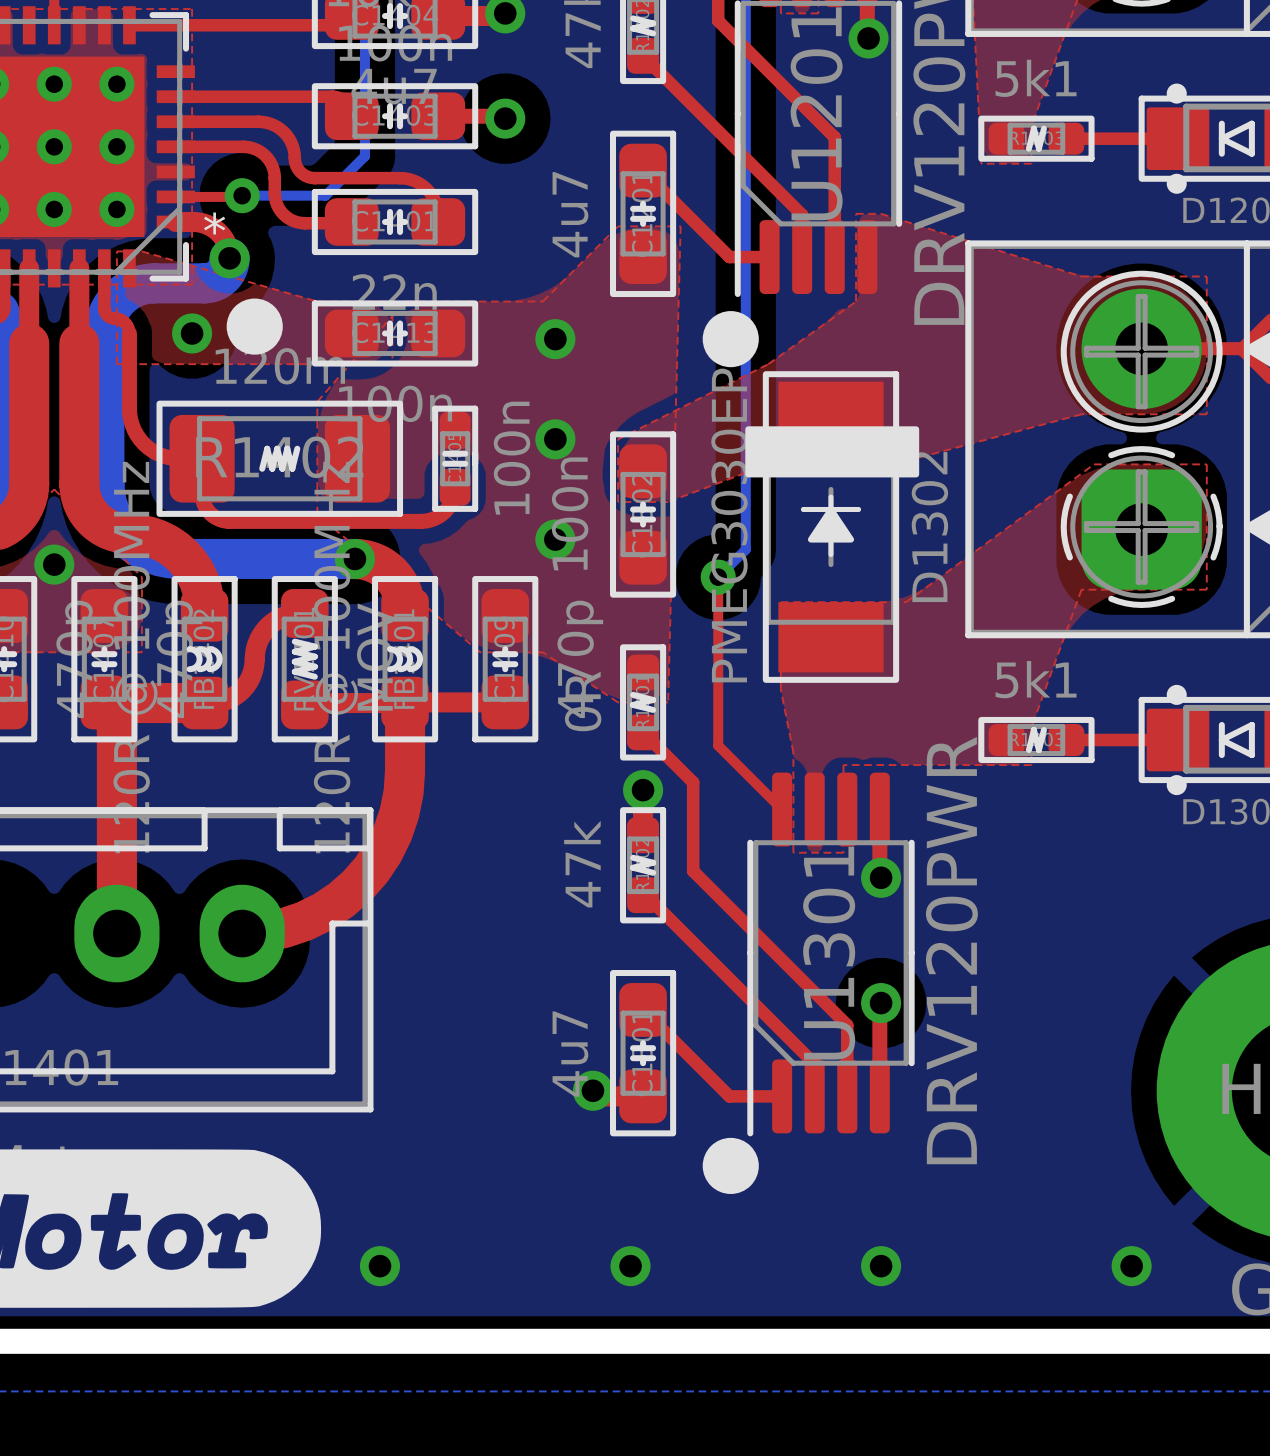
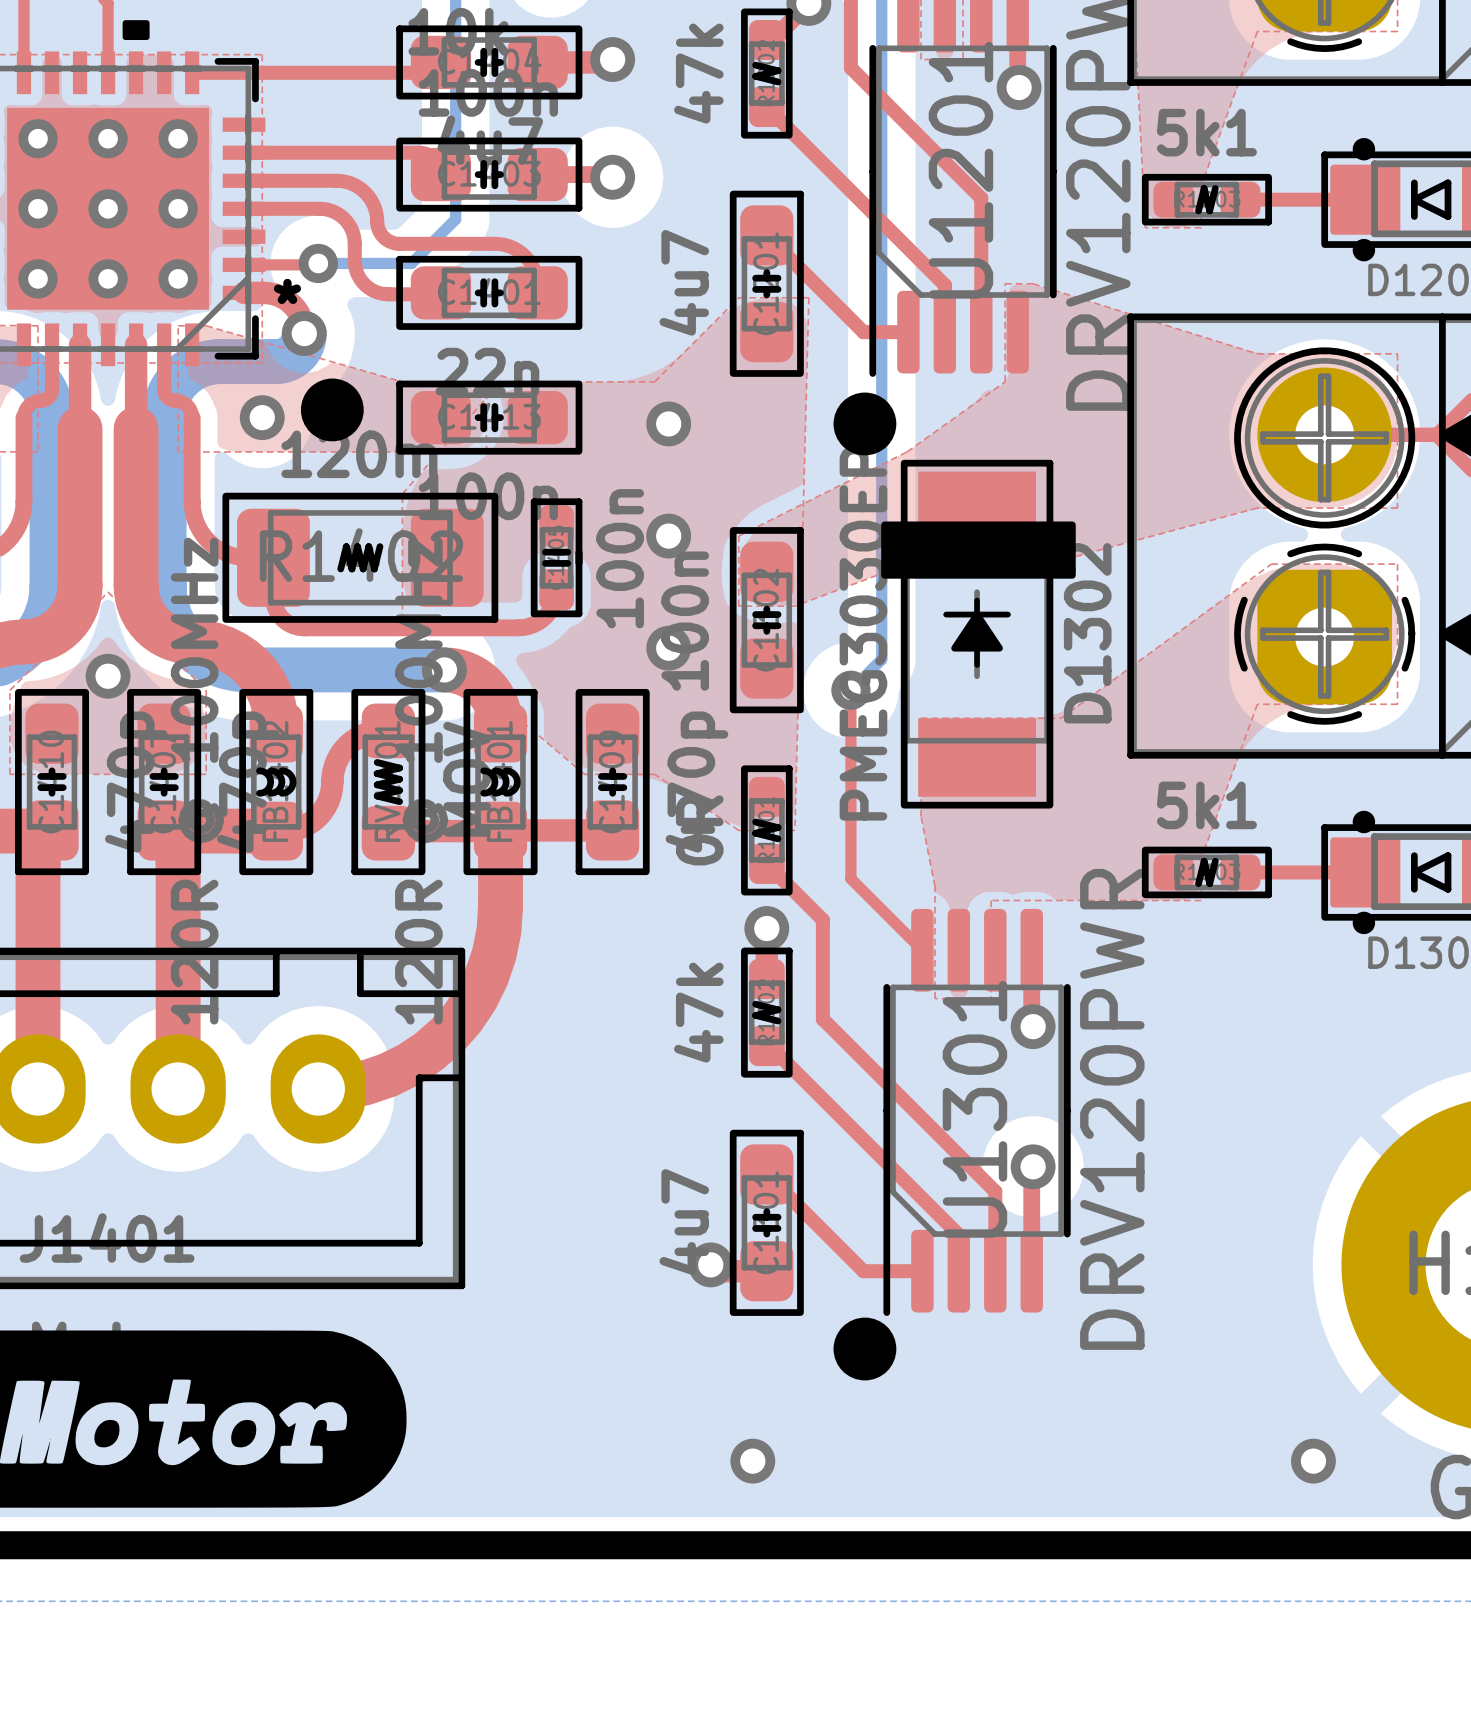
via: (379, 1266) -> none
via: (881, 1266) -> none

